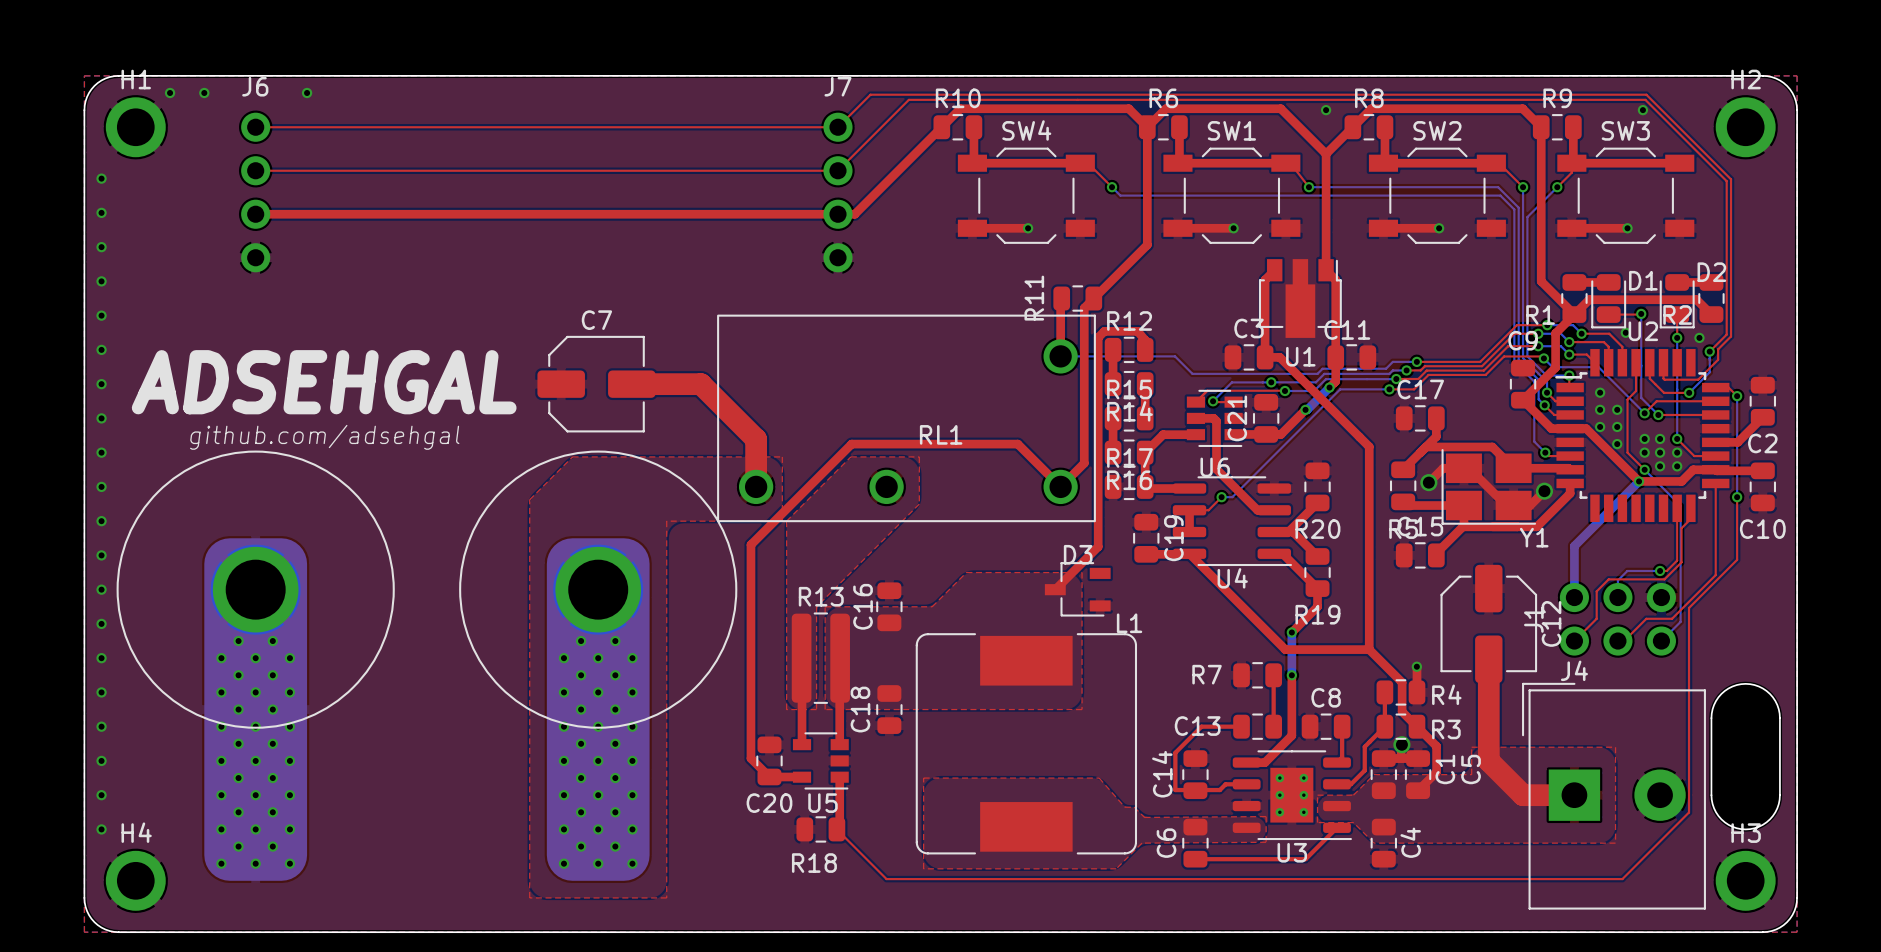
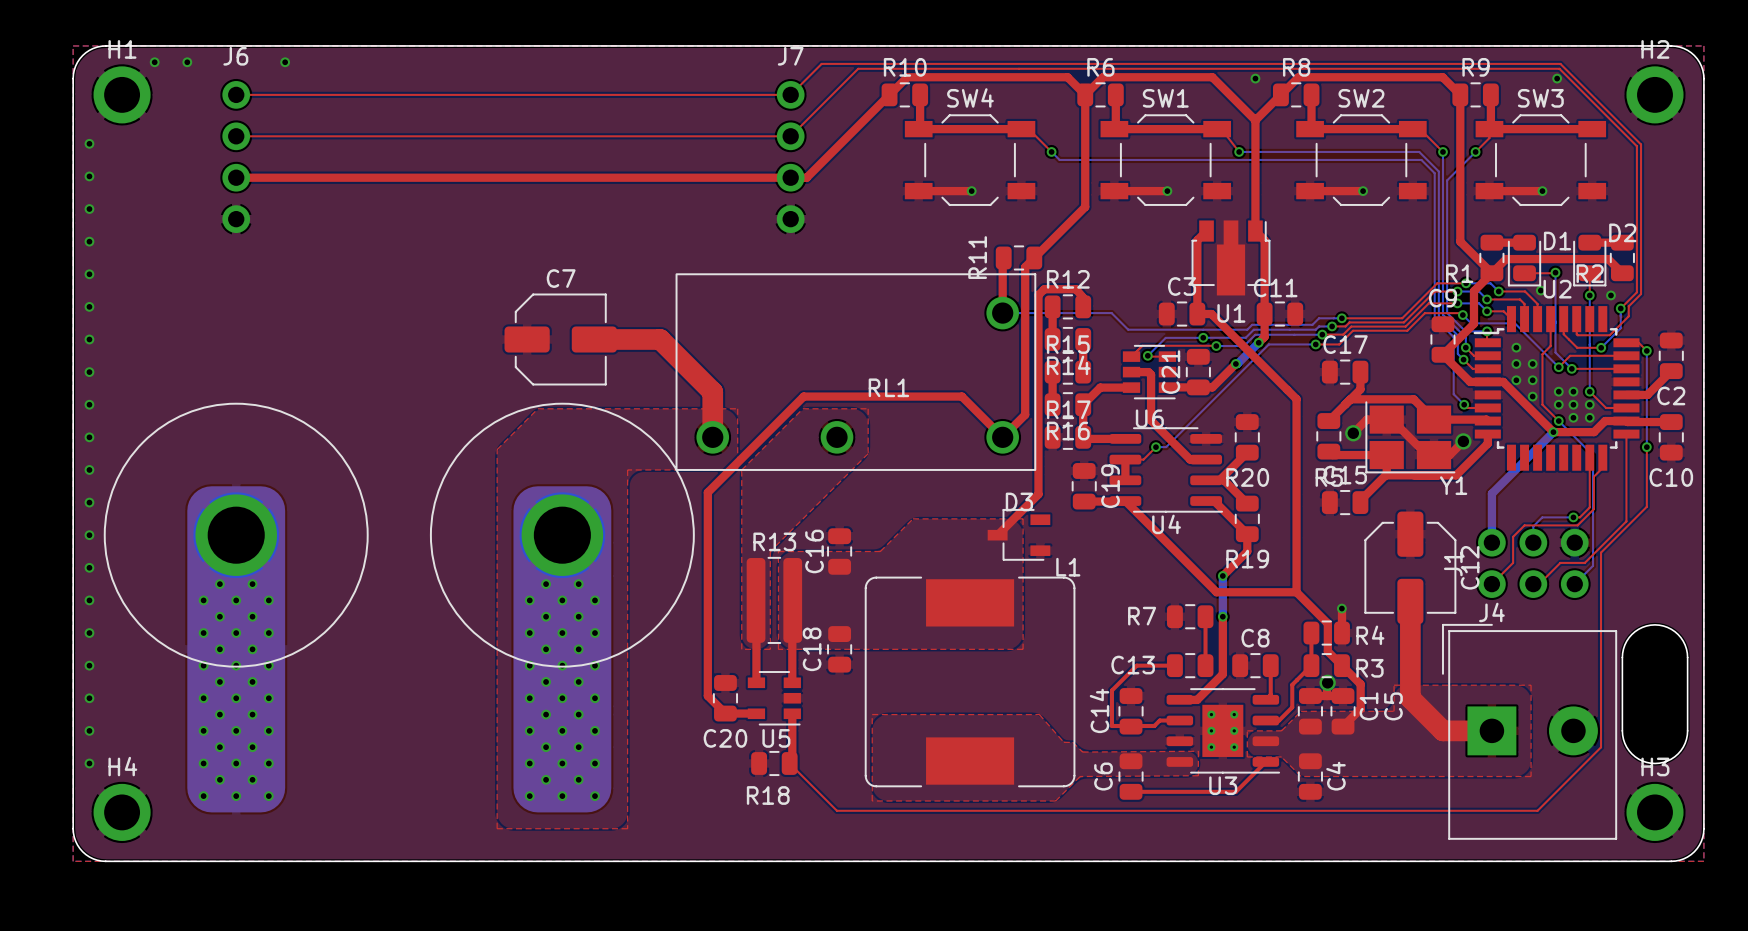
text: ADSEHGAL (324, 382) -> none
text: github.com/adsehgal (324, 437) -> none

